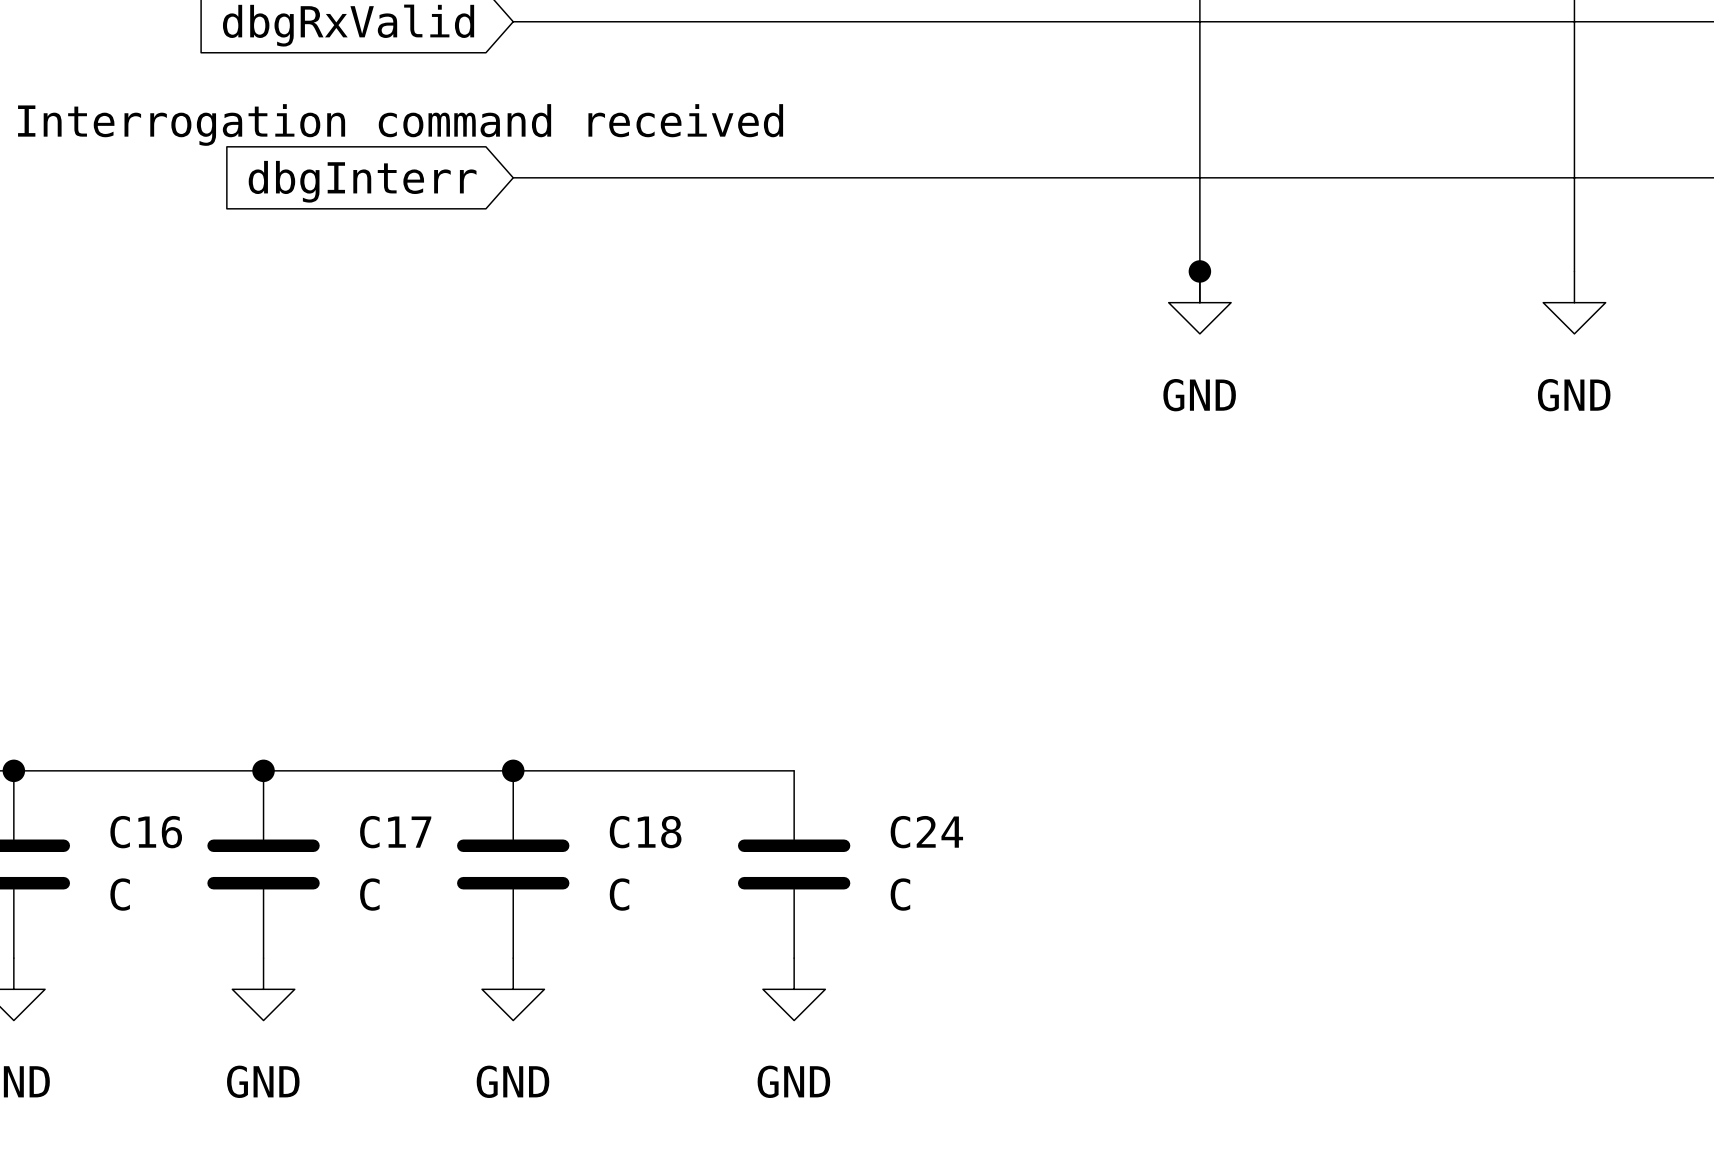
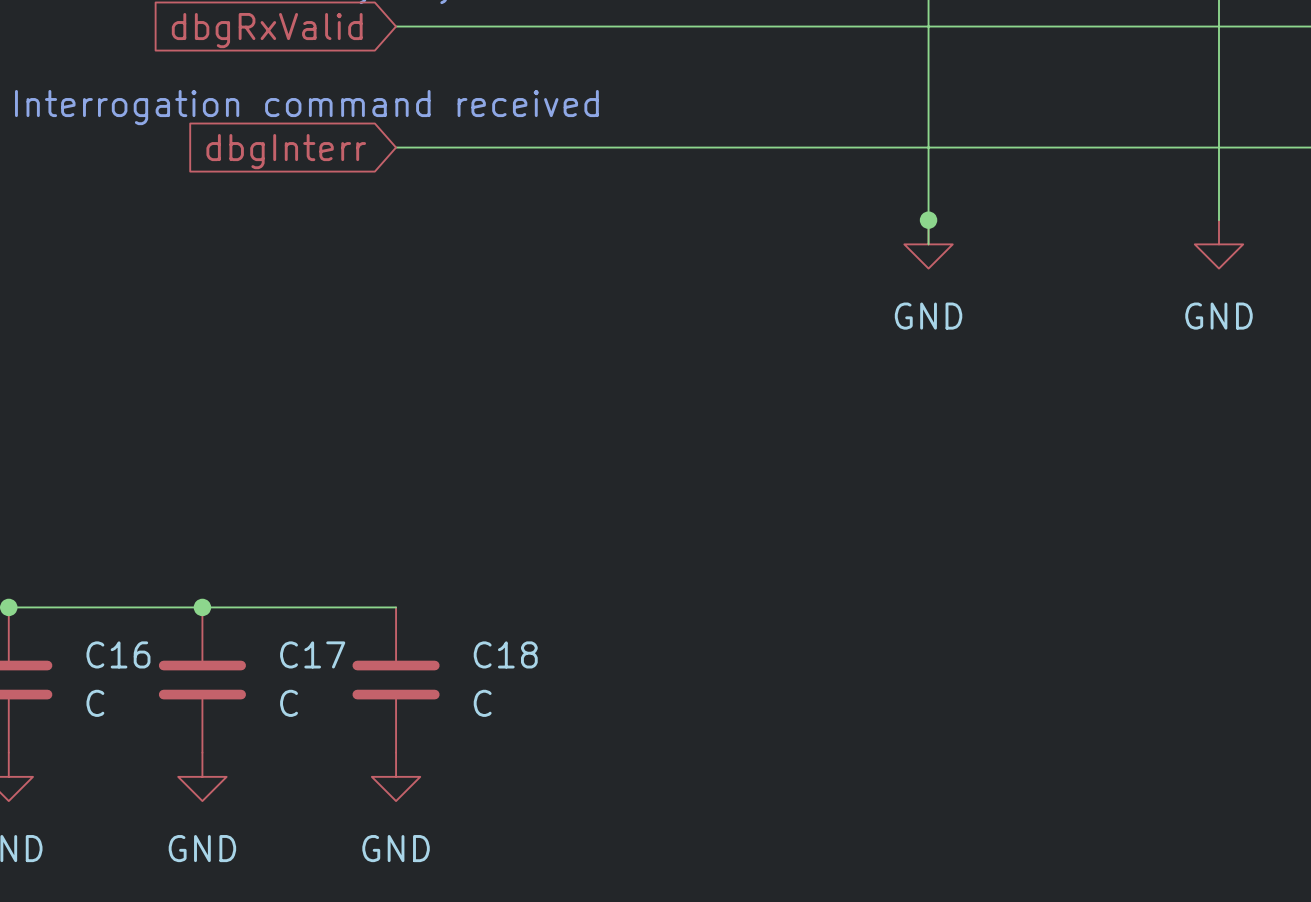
wire: (513, 770) (794, 770) -> none
junction: (513, 770) -> none
C24: C (794, 864) -> none
power symbol: GND (794, 989) -> none

